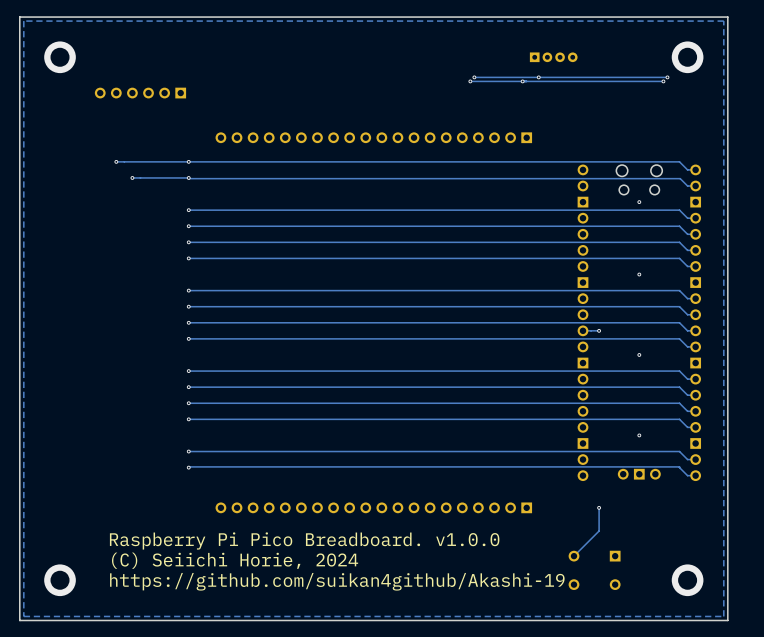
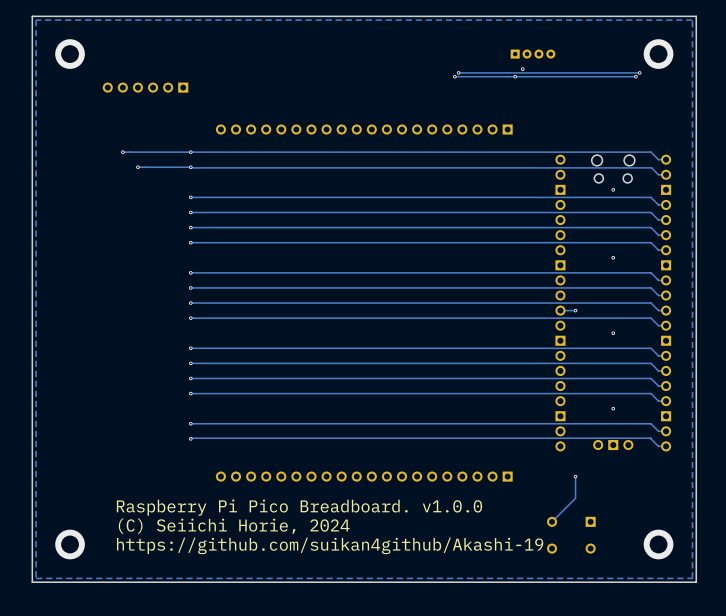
via: none -> (522, 69)
via: (538, 77) -> none
via: (522, 81) -> none
via: none -> (515, 76)

